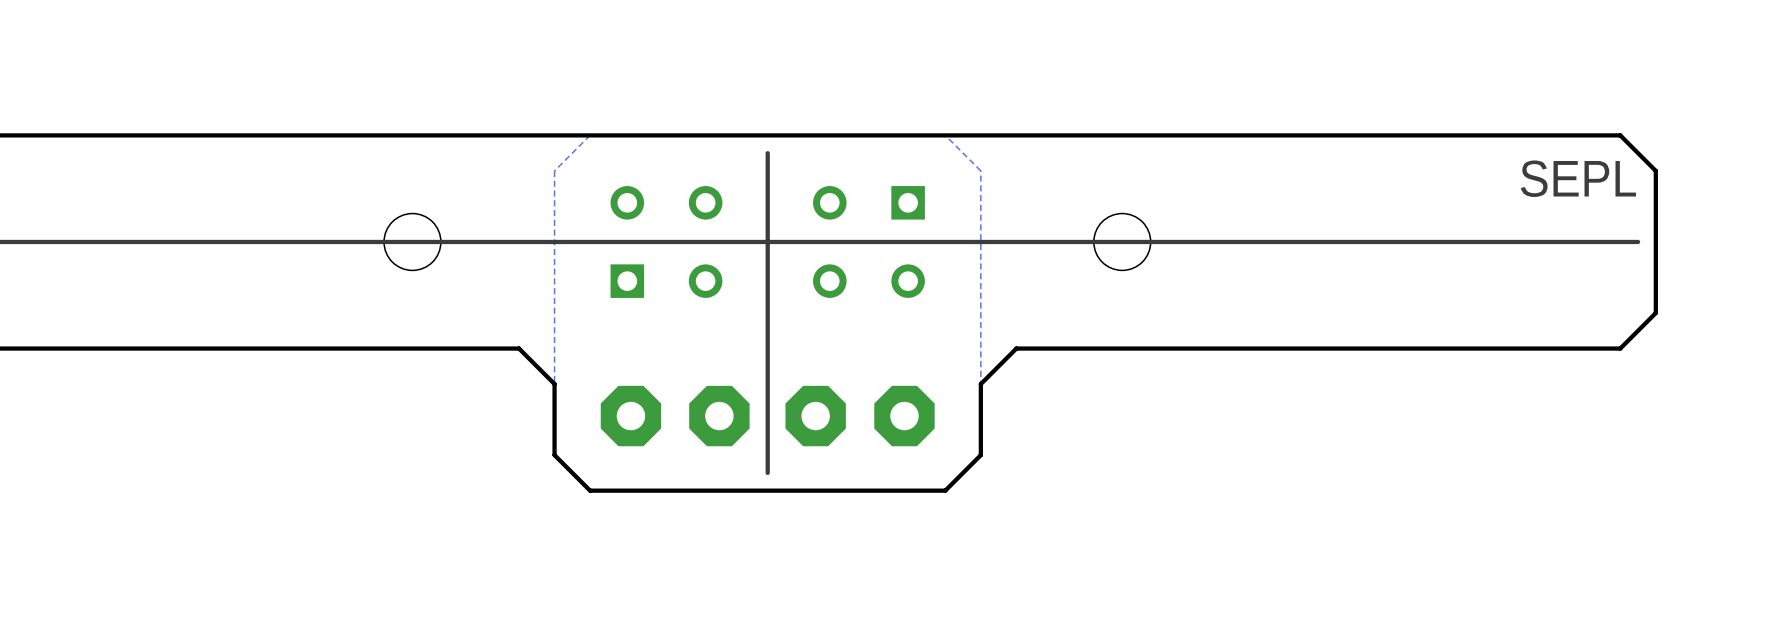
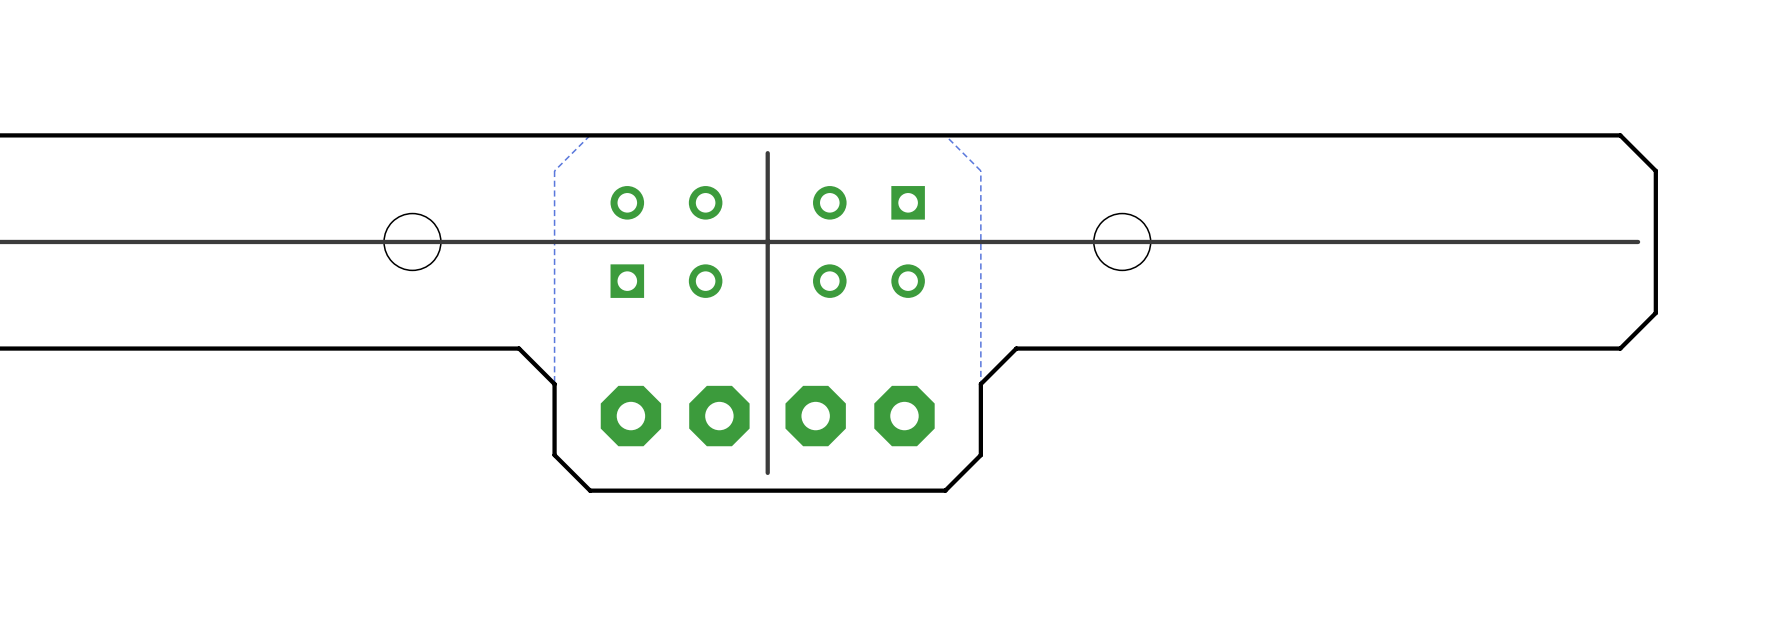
text: SEPL (1578, 178) -> none

